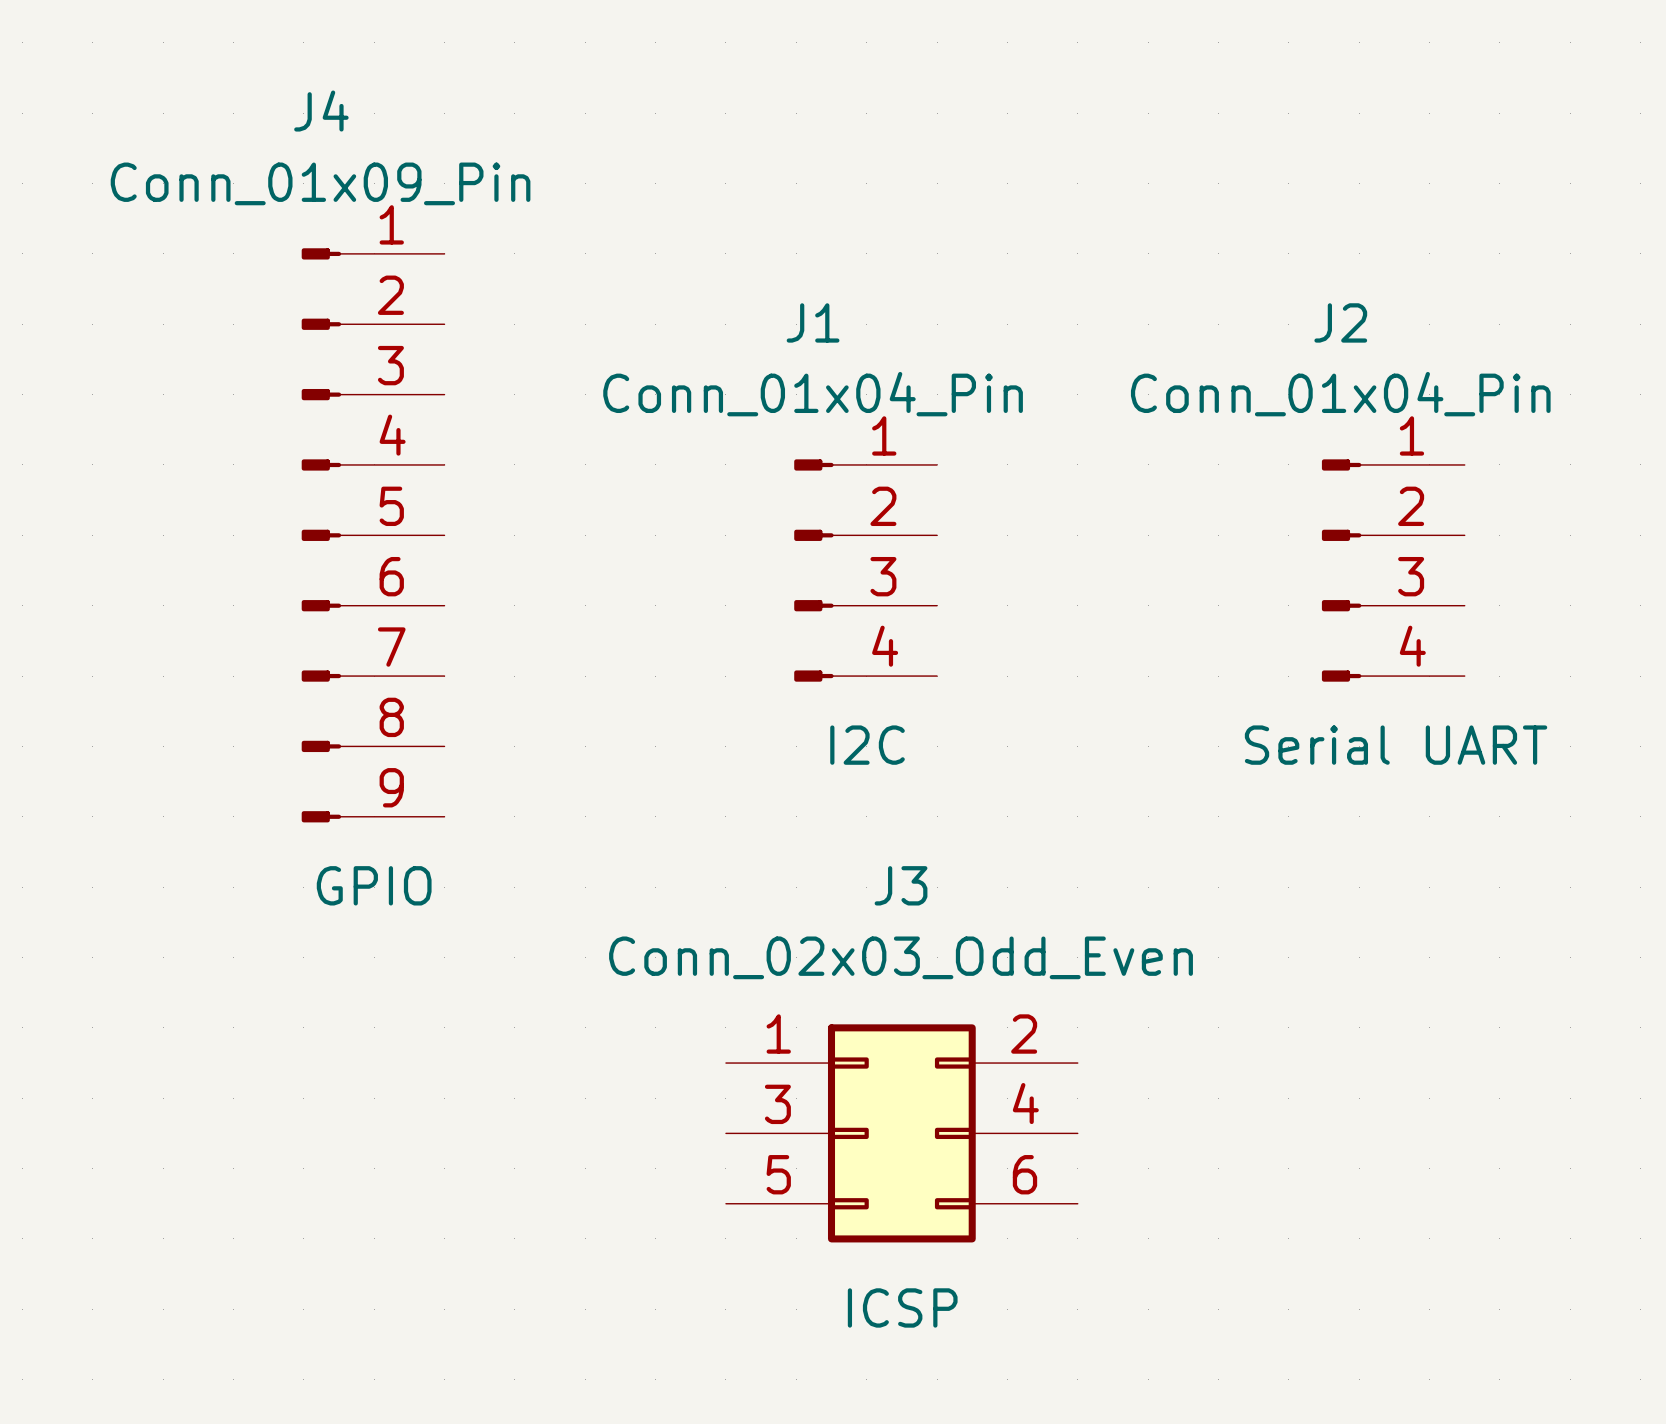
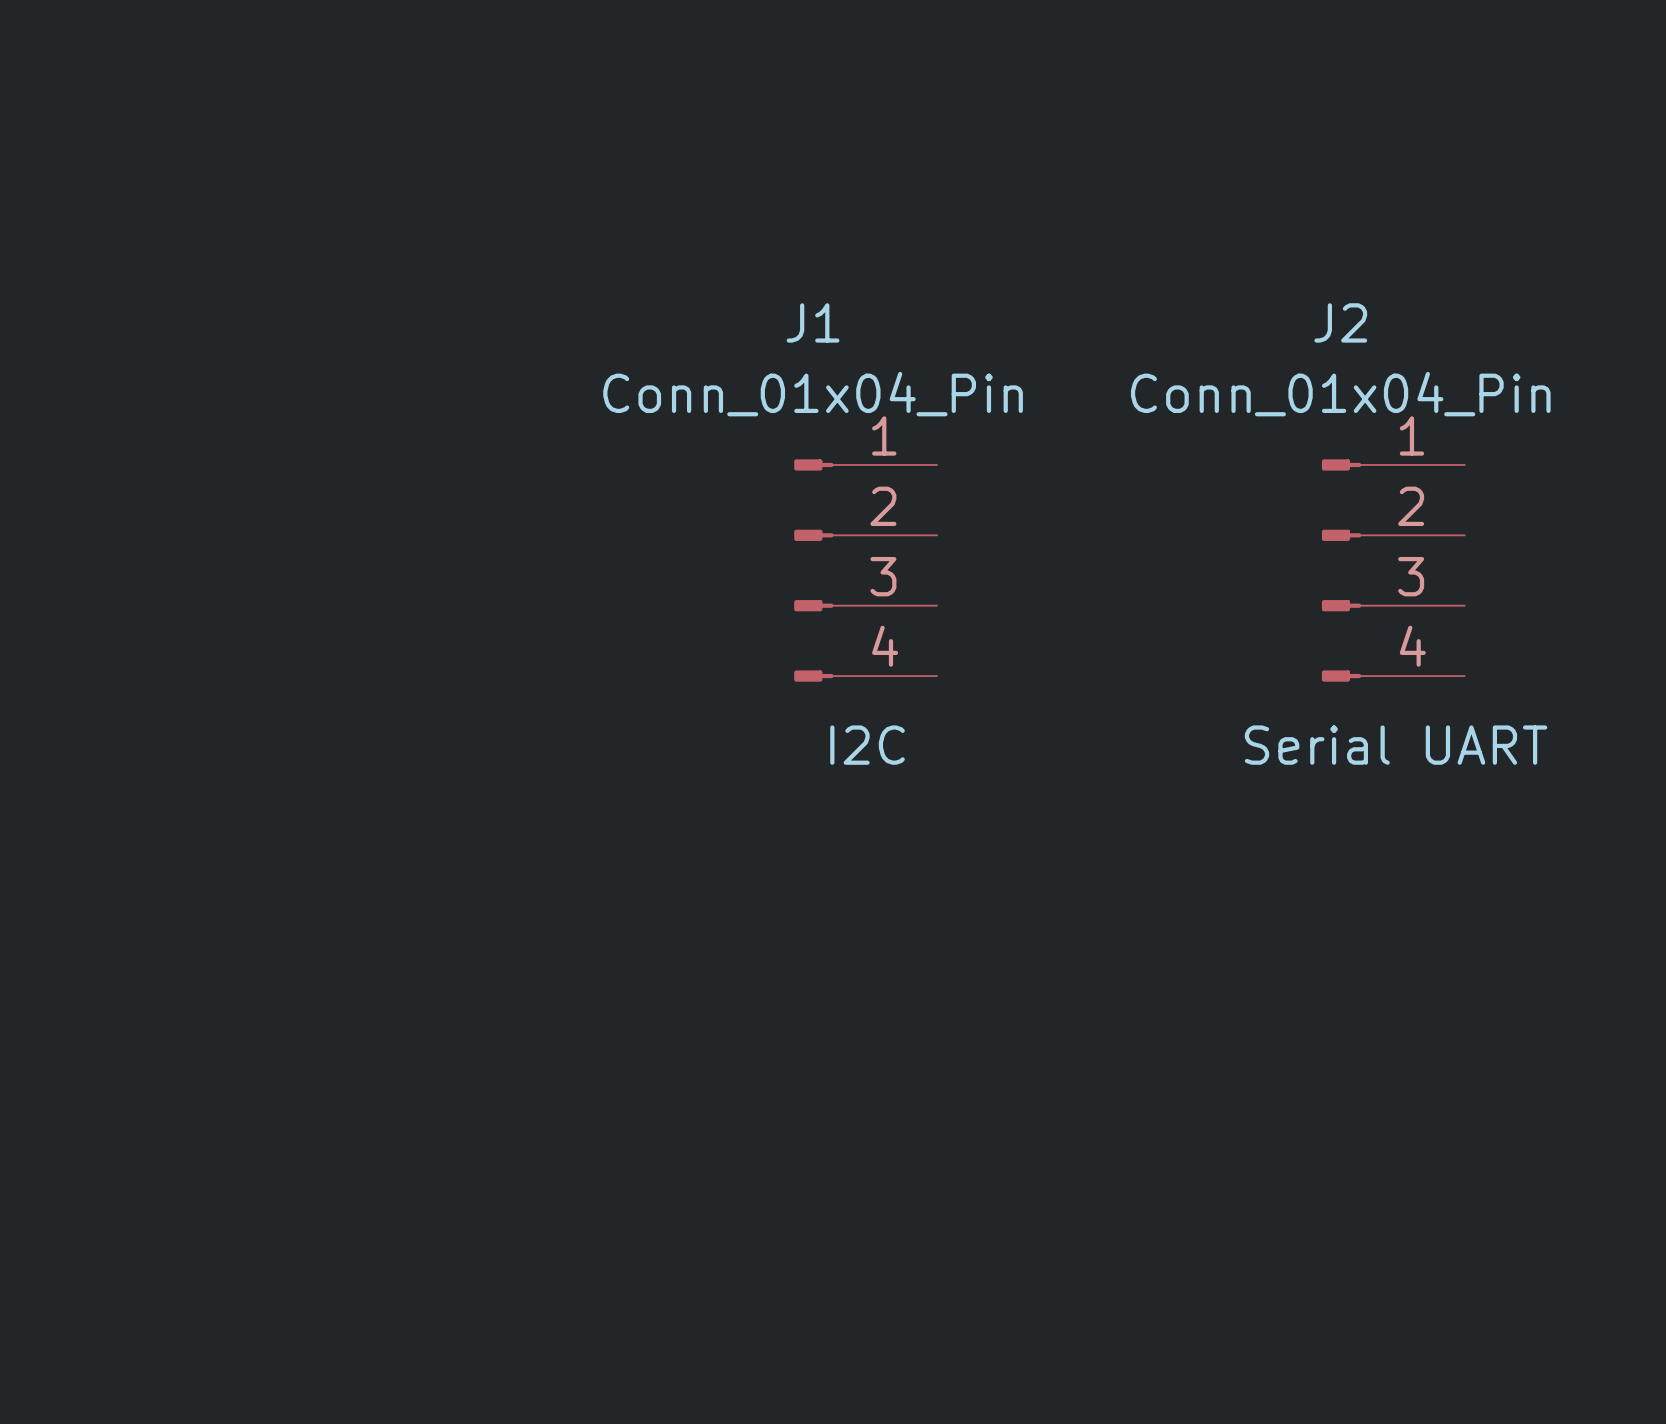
J4: Conn_01x09_Pin (373, 535) -> none
J3: Conn_02x03_Odd_Even (901, 1133) -> none

